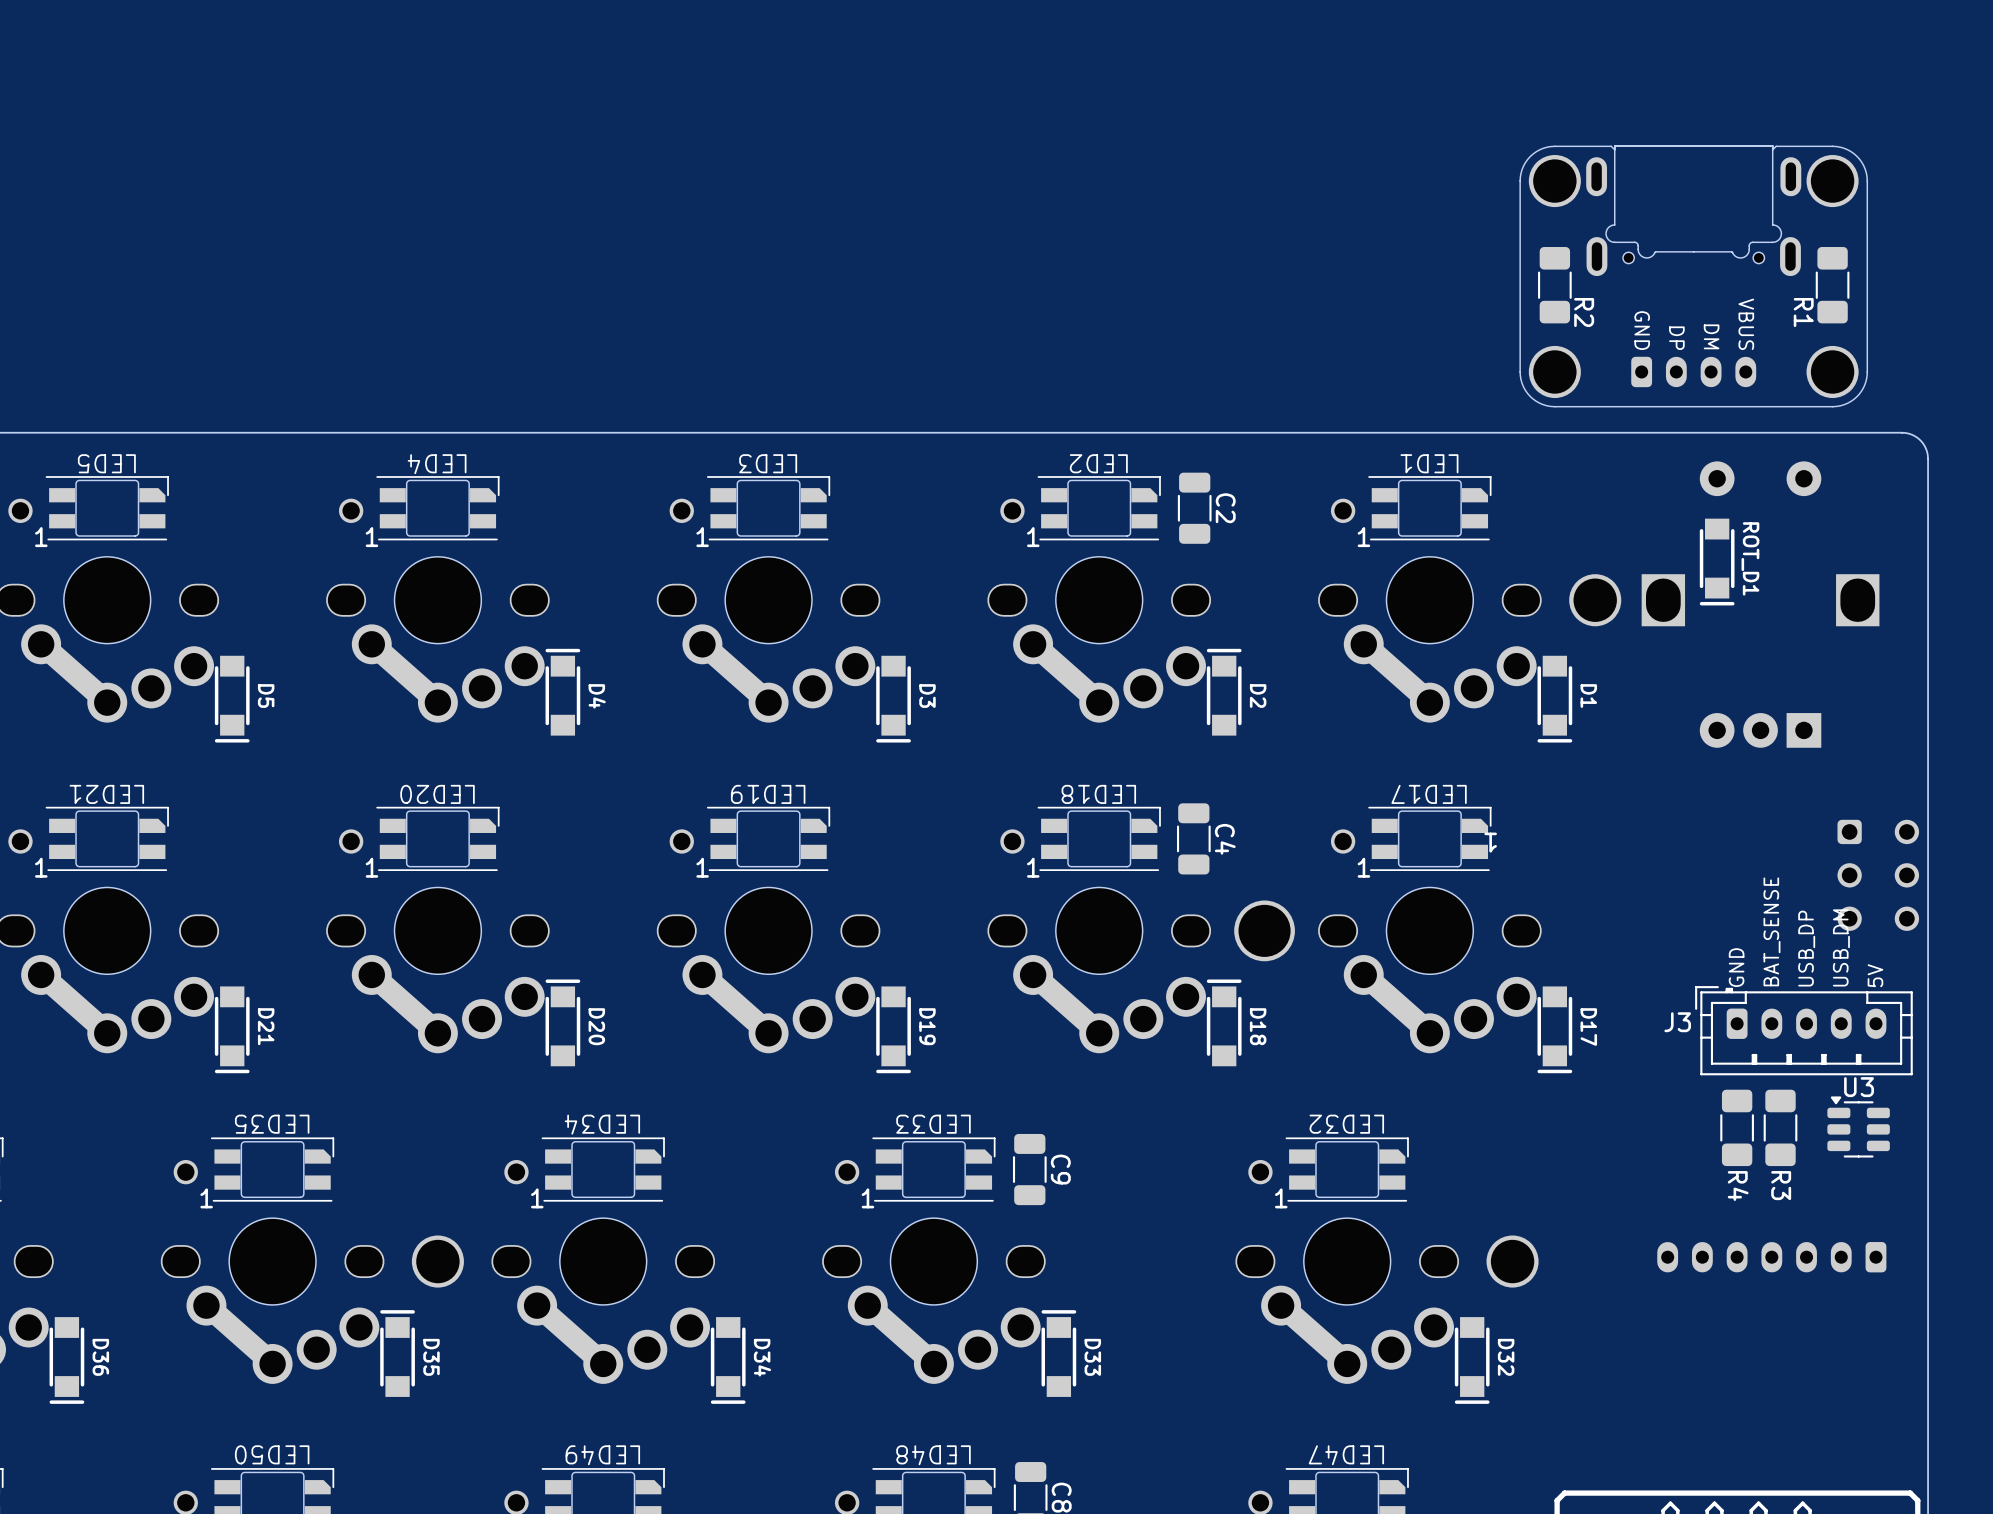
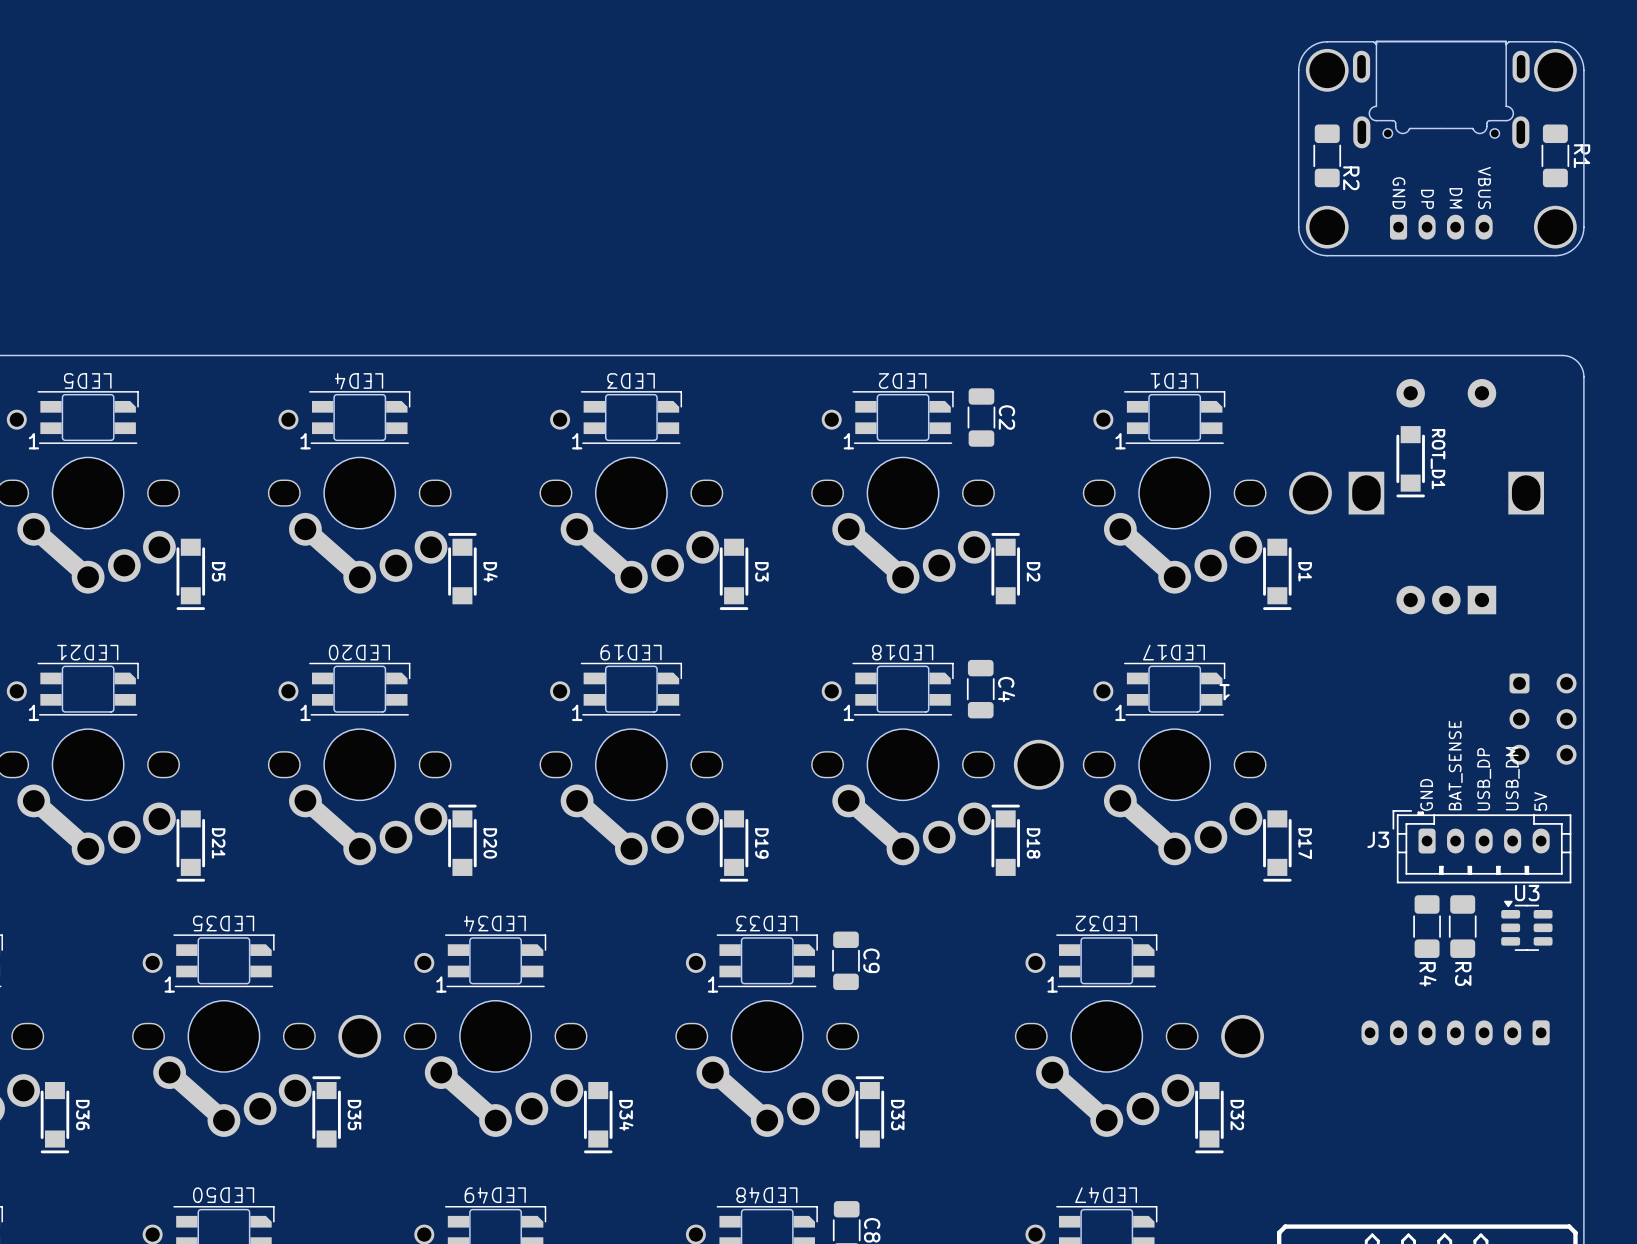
part: none -> (1327, 70)
part: none -> (1555, 70)
board edge: (1772, 145) (1614, 145) (1614, 149) (1611, 146) (1554, 146) (1543, 148) (1530, 156) (1522, 169) (1520, 181) (1520, 371) (1522, 383) (1530, 396) (1543, 404) (1554, 406) (1832, 406) (1844, 404) (1857, 396) (1865, 383) (1867, 371) (1867, 181) (1865, 169) (1857, 156) (1840, 147) (1776, 146) (1772, 149) (1772, 145) -> (1506, 41) (1376, 41) (1376, 44) (1373, 41) (1327, 41) (1314, 44) (1307, 50) (1301, 57) (1298, 70) (1298, 227) (1301, 239) (1307, 247) (1317, 254) (1327, 255) (1555, 255) (1564, 254) (1575, 247) (1581, 239) (1583, 227) (1583, 70) (1582, 60) (1573, 48) (1561, 42) (1509, 41) (1506, 44) (1506, 41)
part: (1554, 181) -> none
part: (1832, 181) -> none
part position: (1693, 210) -> (1441, 94)
part: none -> (1327, 227)
part: none -> (1555, 227)
R2 position: (1554, 285) -> (1327, 155)
R1 position: (1832, 285) -> (1555, 155)
R1 name position: R1 (1803, 312) -> R1 (1582, 156)
text position: VBUS (1746, 324) -> VBUS (1484, 187)
text position: GND (1642, 330) -> GND (1398, 193)
text position: DM (1711, 336) -> DM (1456, 198)
text position: DP (1676, 338) -> DP (1427, 199)
part: (1554, 371) -> none
part position: (1693, 371) -> (1441, 227)
part: (1832, 371) -> none

